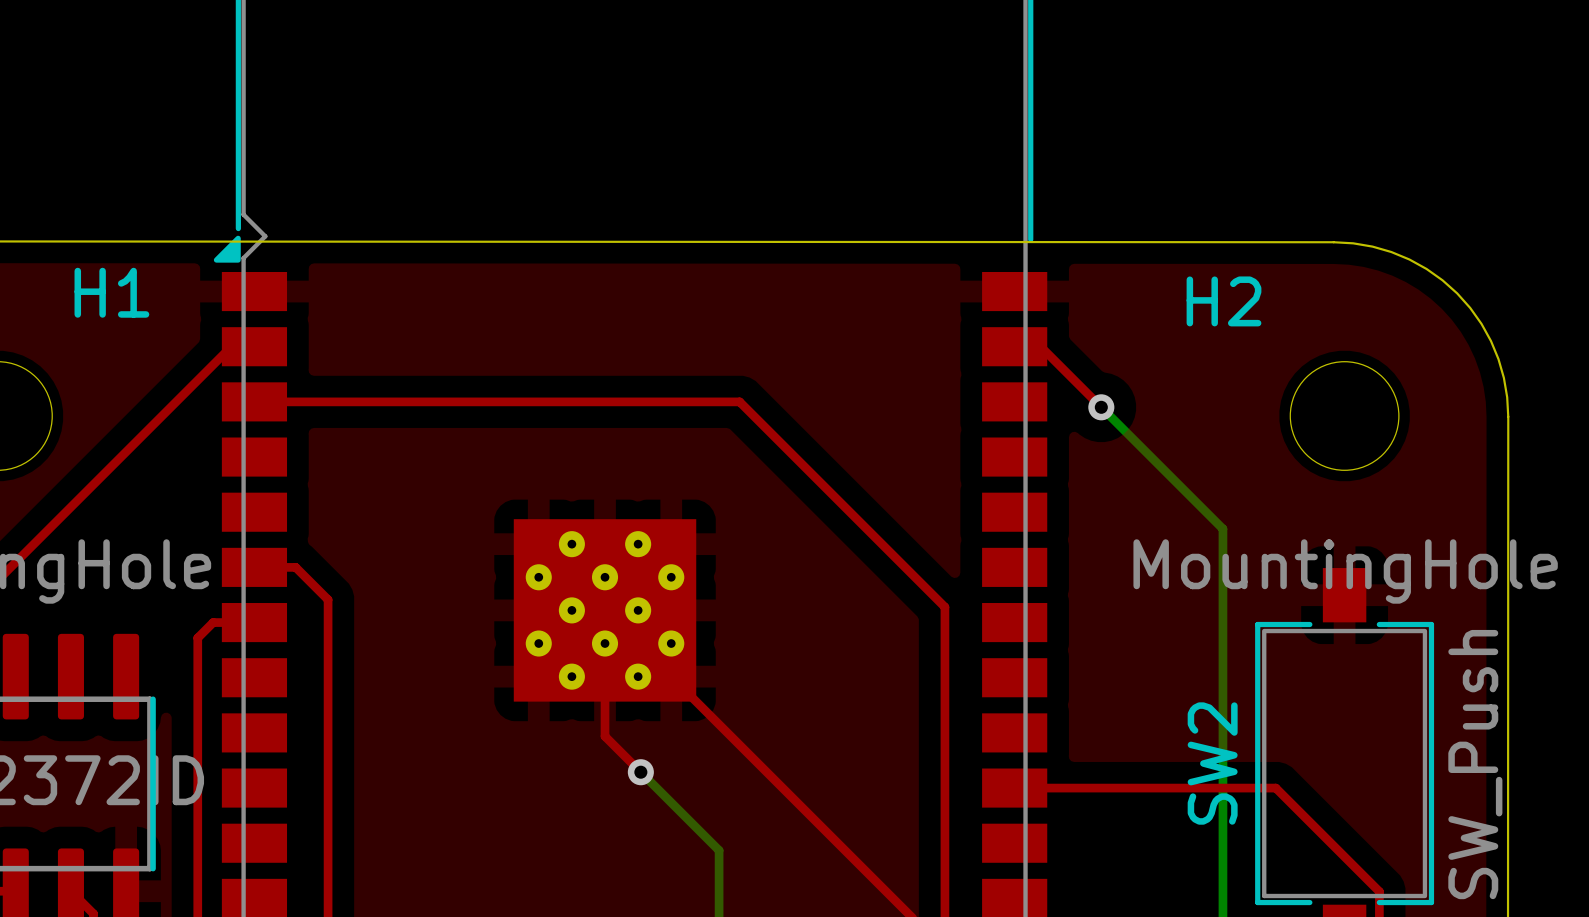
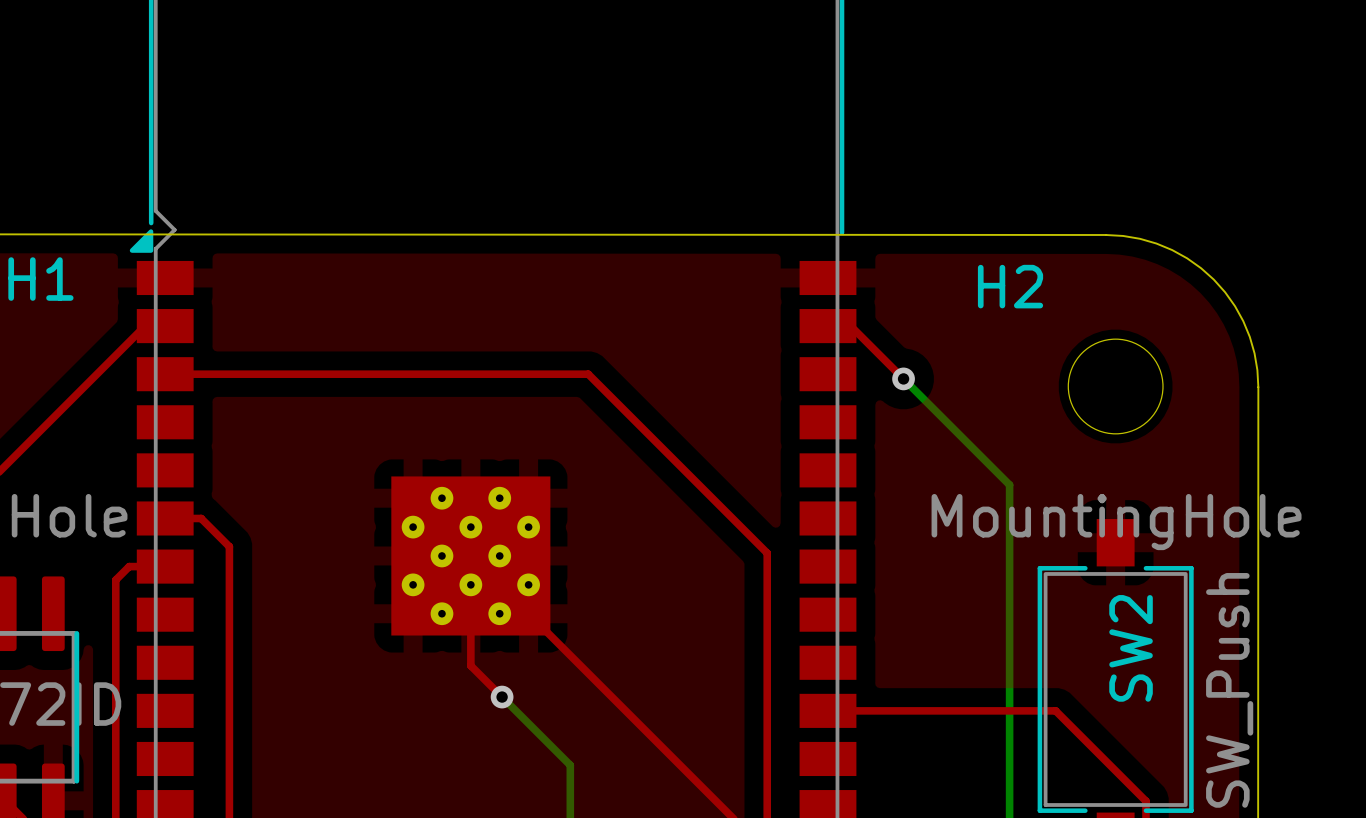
SW2 name position: SW2 (1212, 763) -> SW2 (1131, 648)

